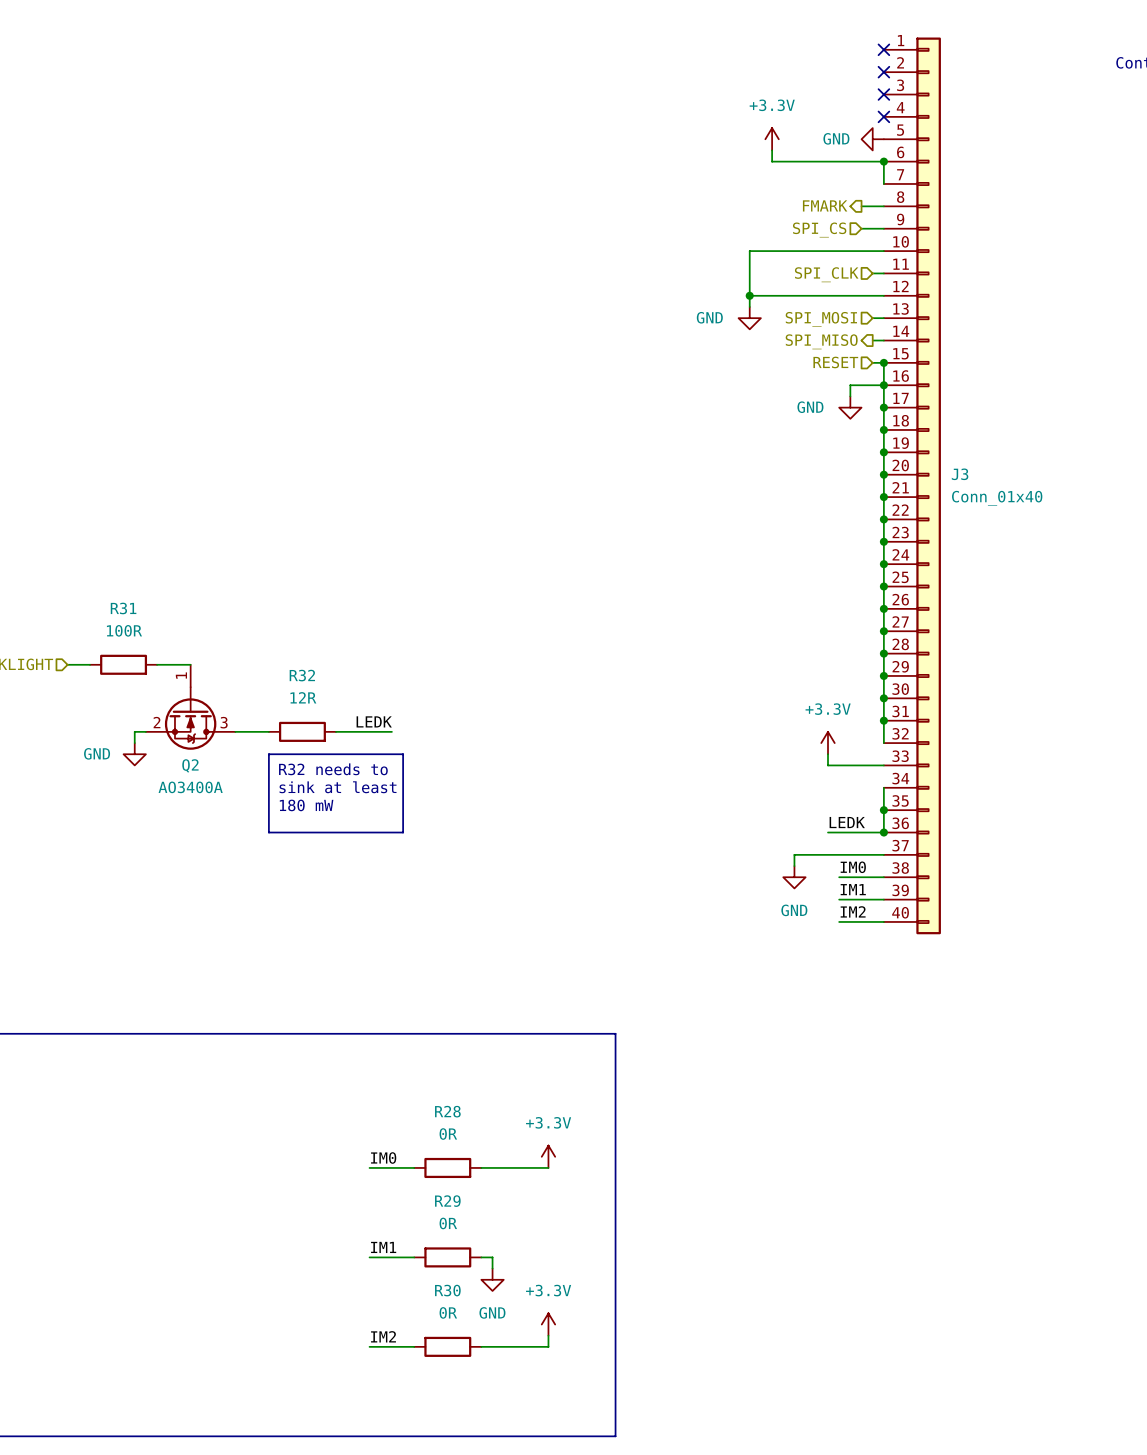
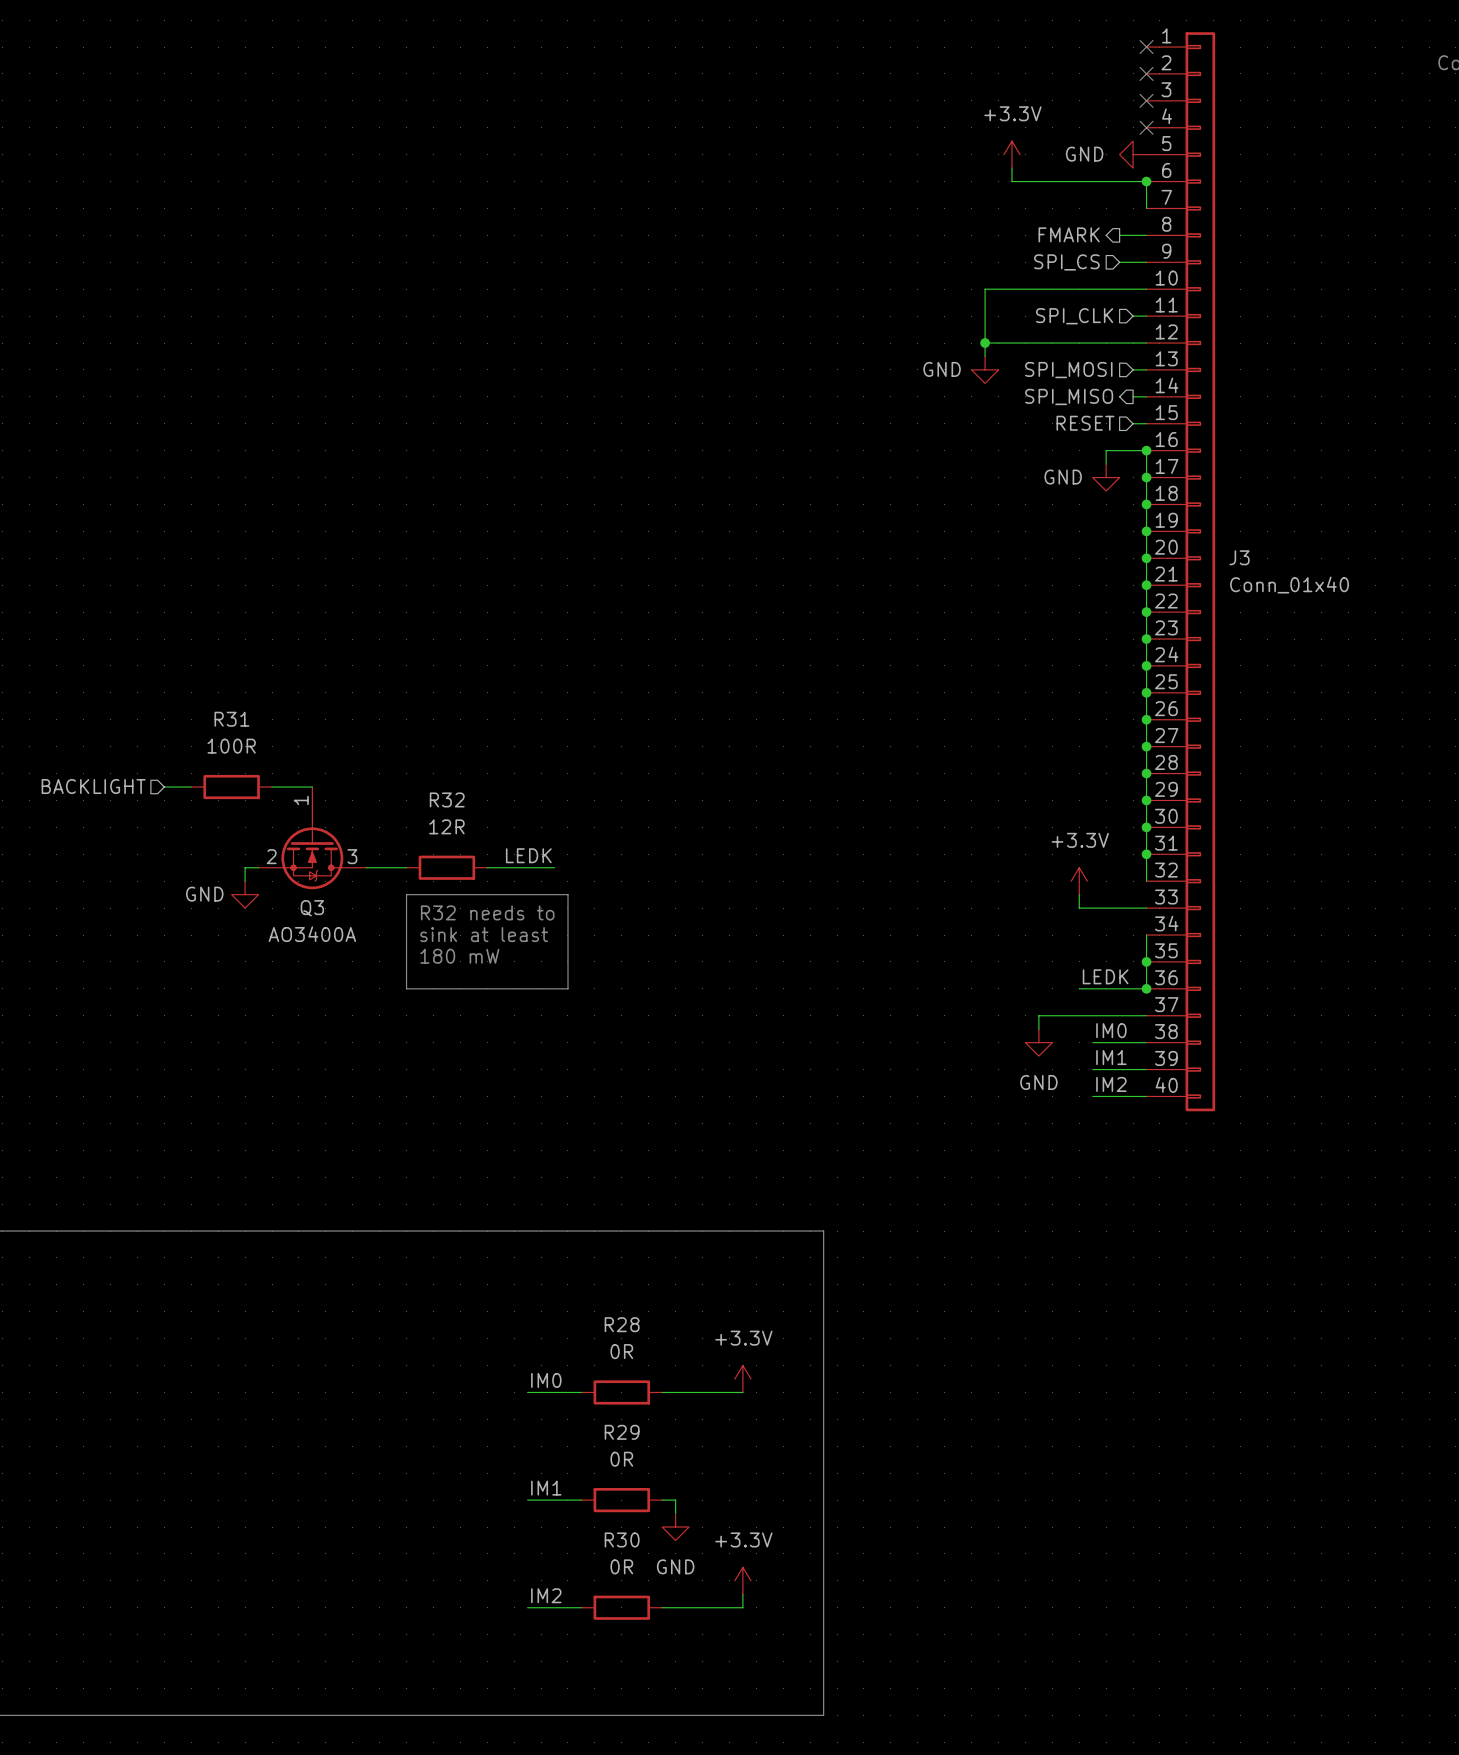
wire: (883, 362) (883, 385) -> none
junction: (883, 362) -> none
Q2 name: Q2 (190, 765) -> Q3 (312, 908)

